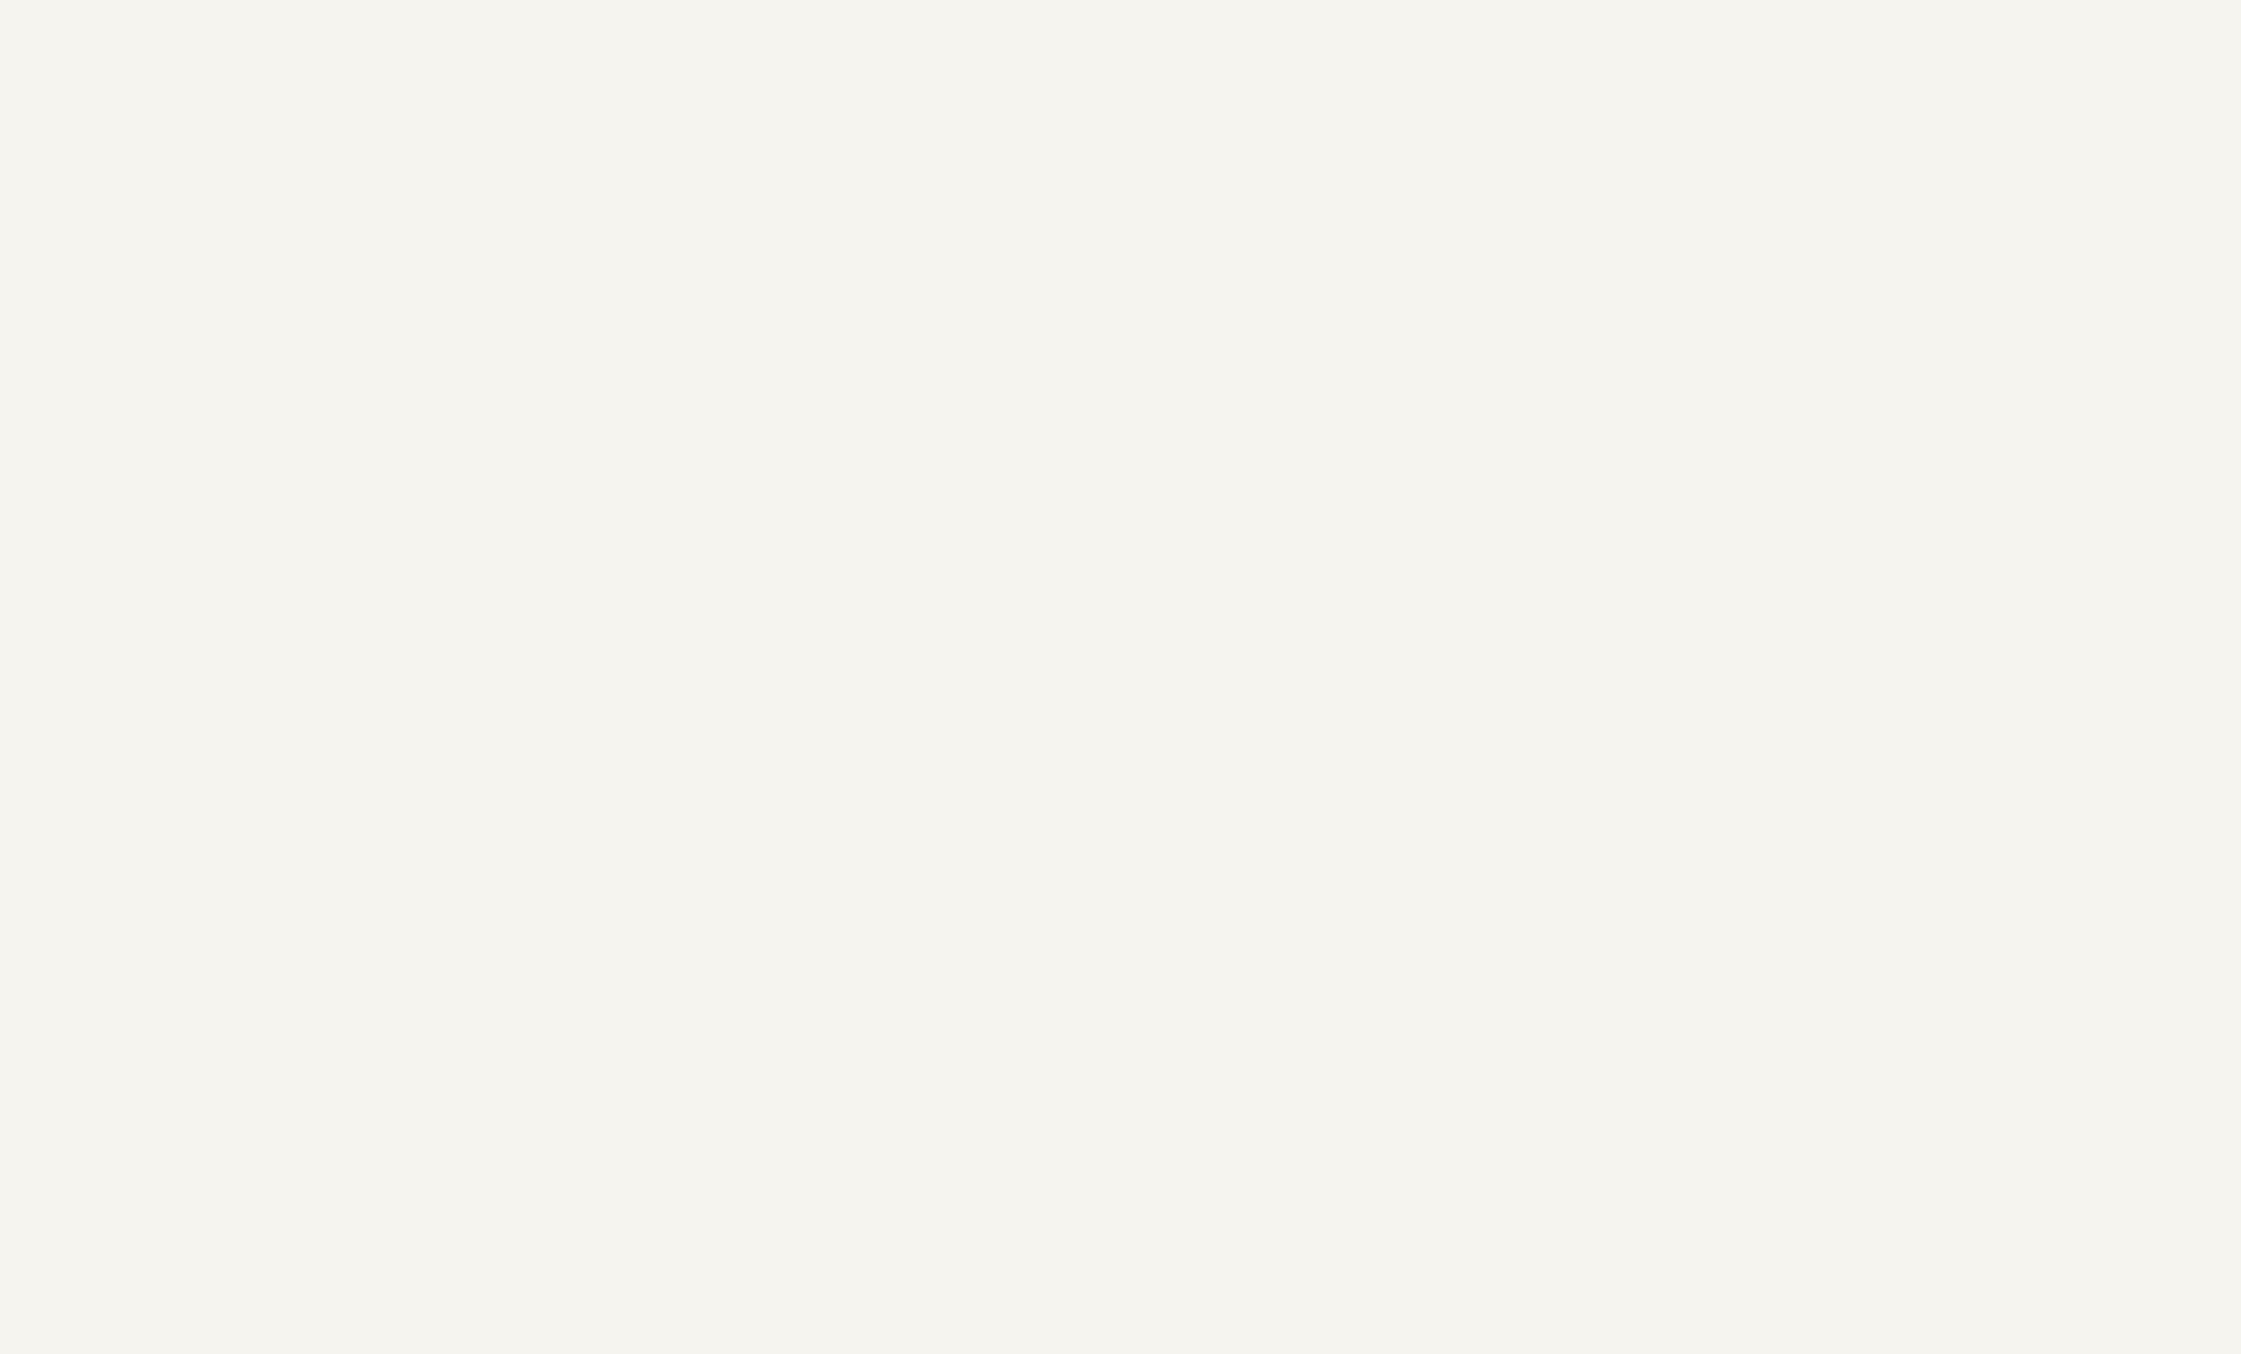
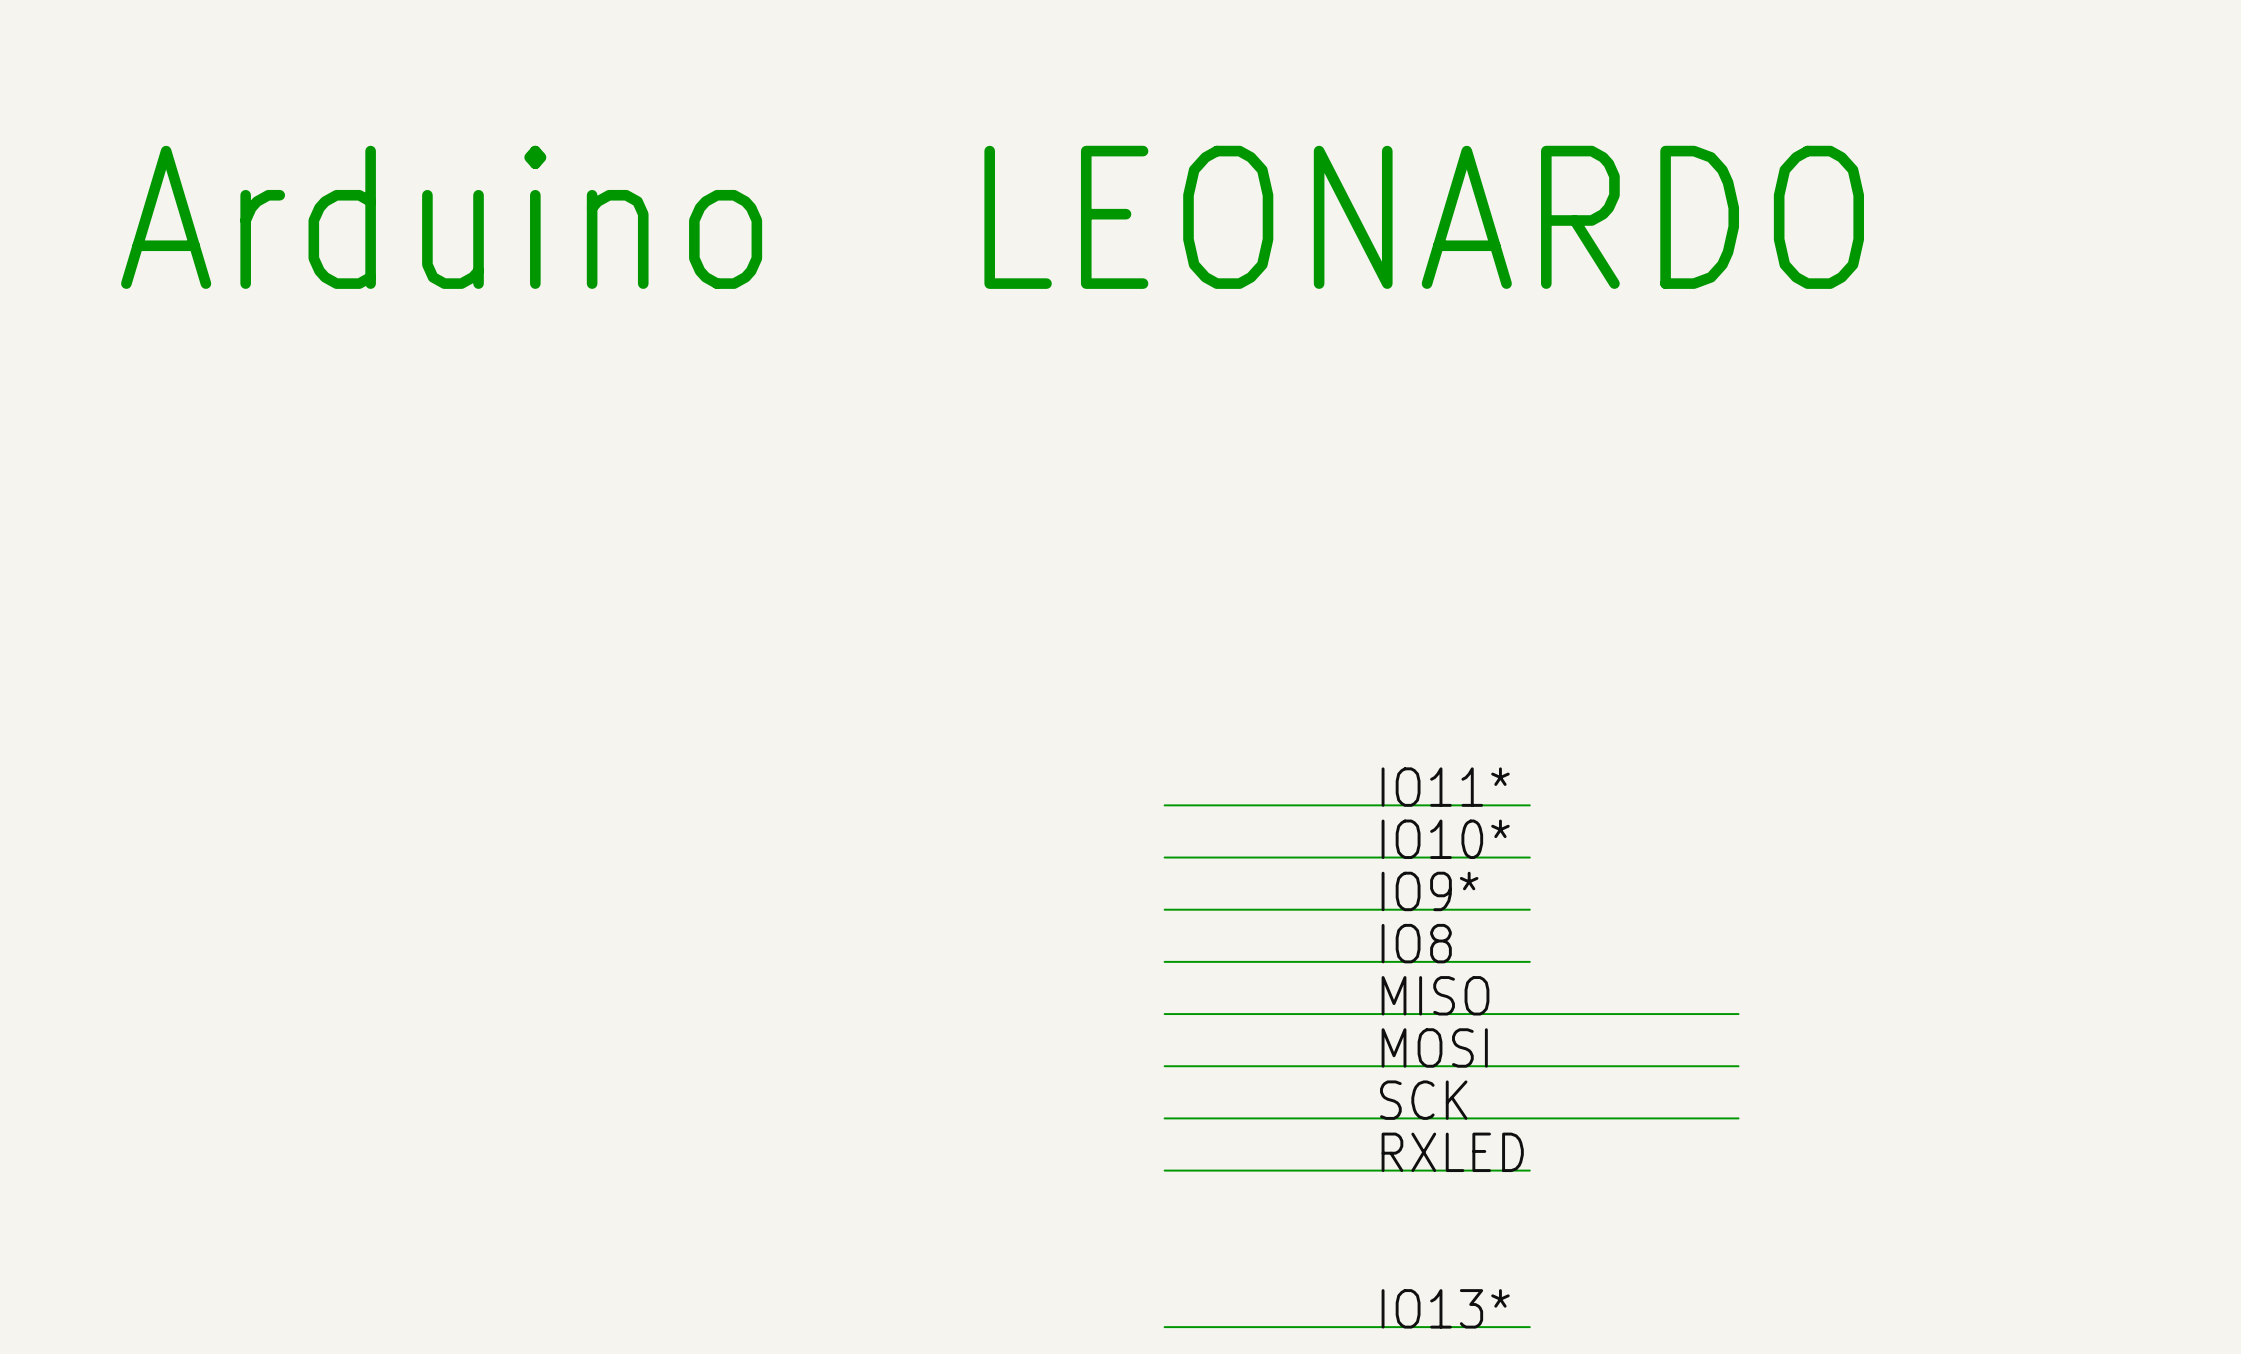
text: none -> Arduino LEONARDO (992, 217)
label: none -> IO11* (1445, 787)
wire: none -> (1164, 805) (1529, 805)
label: none -> IO10* (1445, 839)
wire: none -> (1164, 857) (1529, 857)
label: none -> IO9* (1430, 891)
wire: none -> (1164, 909) (1529, 909)
label: none -> IO8 (1416, 943)
wire: none -> (1164, 961) (1529, 961)
label: none -> MISO (1435, 995)
wire: none -> (1164, 1014) (1738, 1014)
label: none -> MOSI (1434, 1047)
wire: none -> (1164, 1066) (1738, 1066)
label: none -> SCK (1423, 1100)
wire: none -> (1164, 1118) (1738, 1118)
label: none -> RXLED (1452, 1152)
wire: none -> (1164, 1170) (1529, 1170)
label: none -> IO13* (1445, 1308)
wire: none -> (1164, 1327) (1529, 1327)

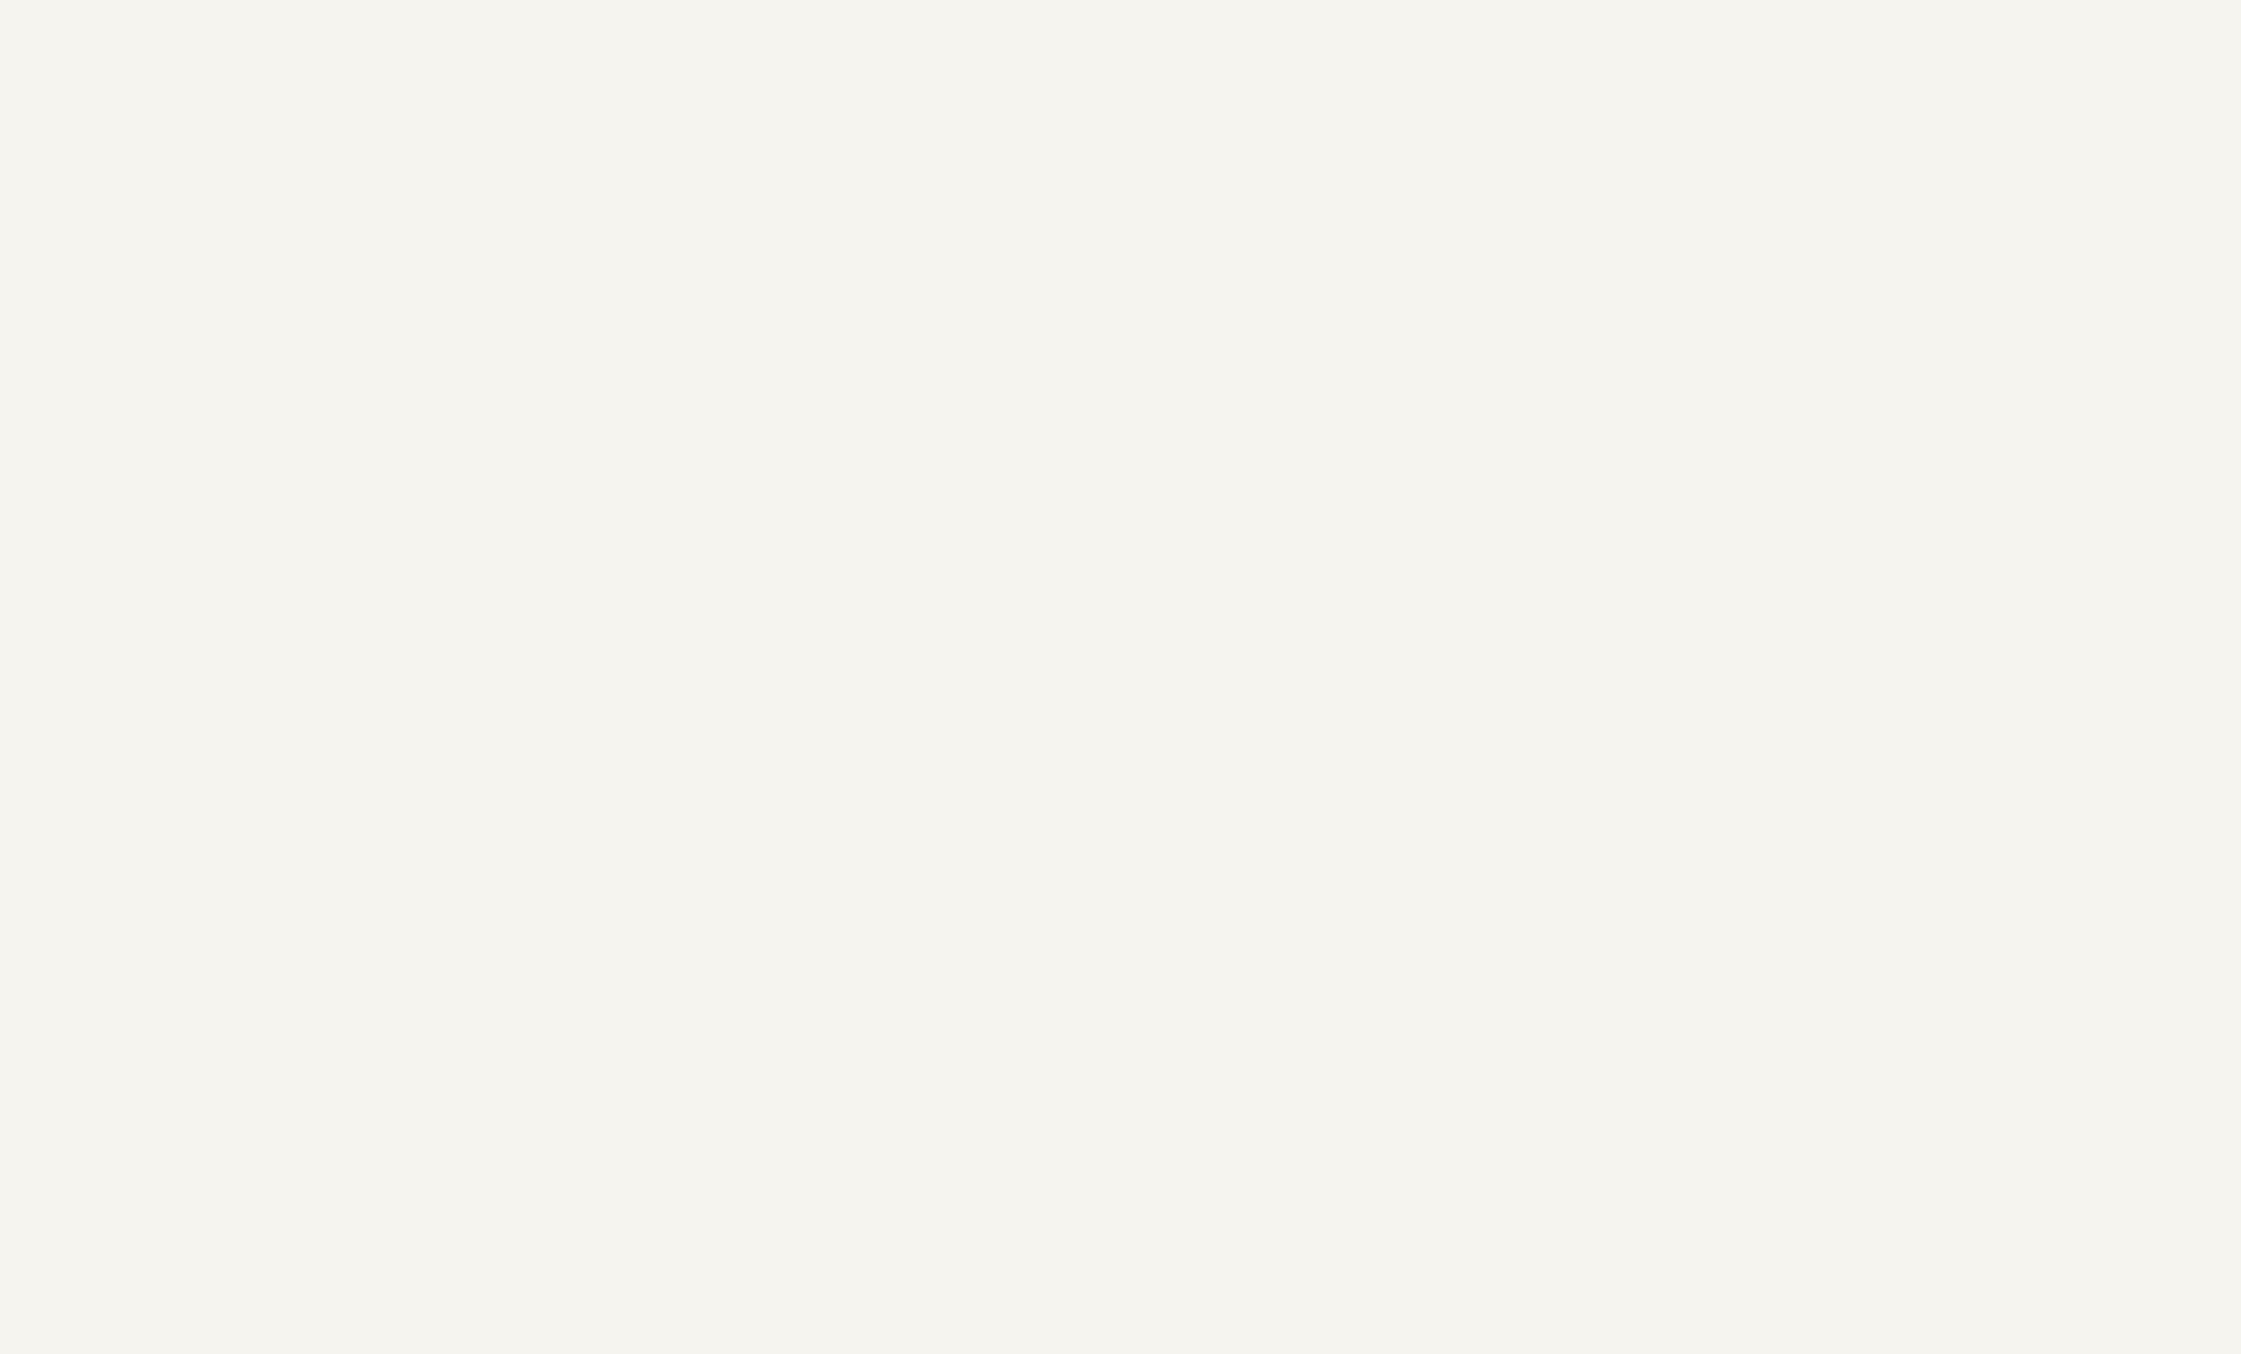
text: Arduino LEONARDO (992, 217) -> none
label: IO11* (1445, 787) -> none
wire: (1164, 805) (1529, 805) -> none
label: IO10* (1445, 839) -> none
wire: (1164, 857) (1529, 857) -> none
label: IO9* (1430, 891) -> none
wire: (1164, 909) (1529, 909) -> none
label: IO8 (1416, 943) -> none
wire: (1164, 961) (1529, 961) -> none
label: MISO (1435, 995) -> none
wire: (1164, 1014) (1738, 1014) -> none
label: MOSI (1434, 1047) -> none
wire: (1164, 1066) (1738, 1066) -> none
label: SCK (1423, 1100) -> none
wire: (1164, 1118) (1738, 1118) -> none
label: RXLED (1452, 1152) -> none
wire: (1164, 1170) (1529, 1170) -> none
label: IO13* (1445, 1308) -> none
wire: (1164, 1327) (1529, 1327) -> none

